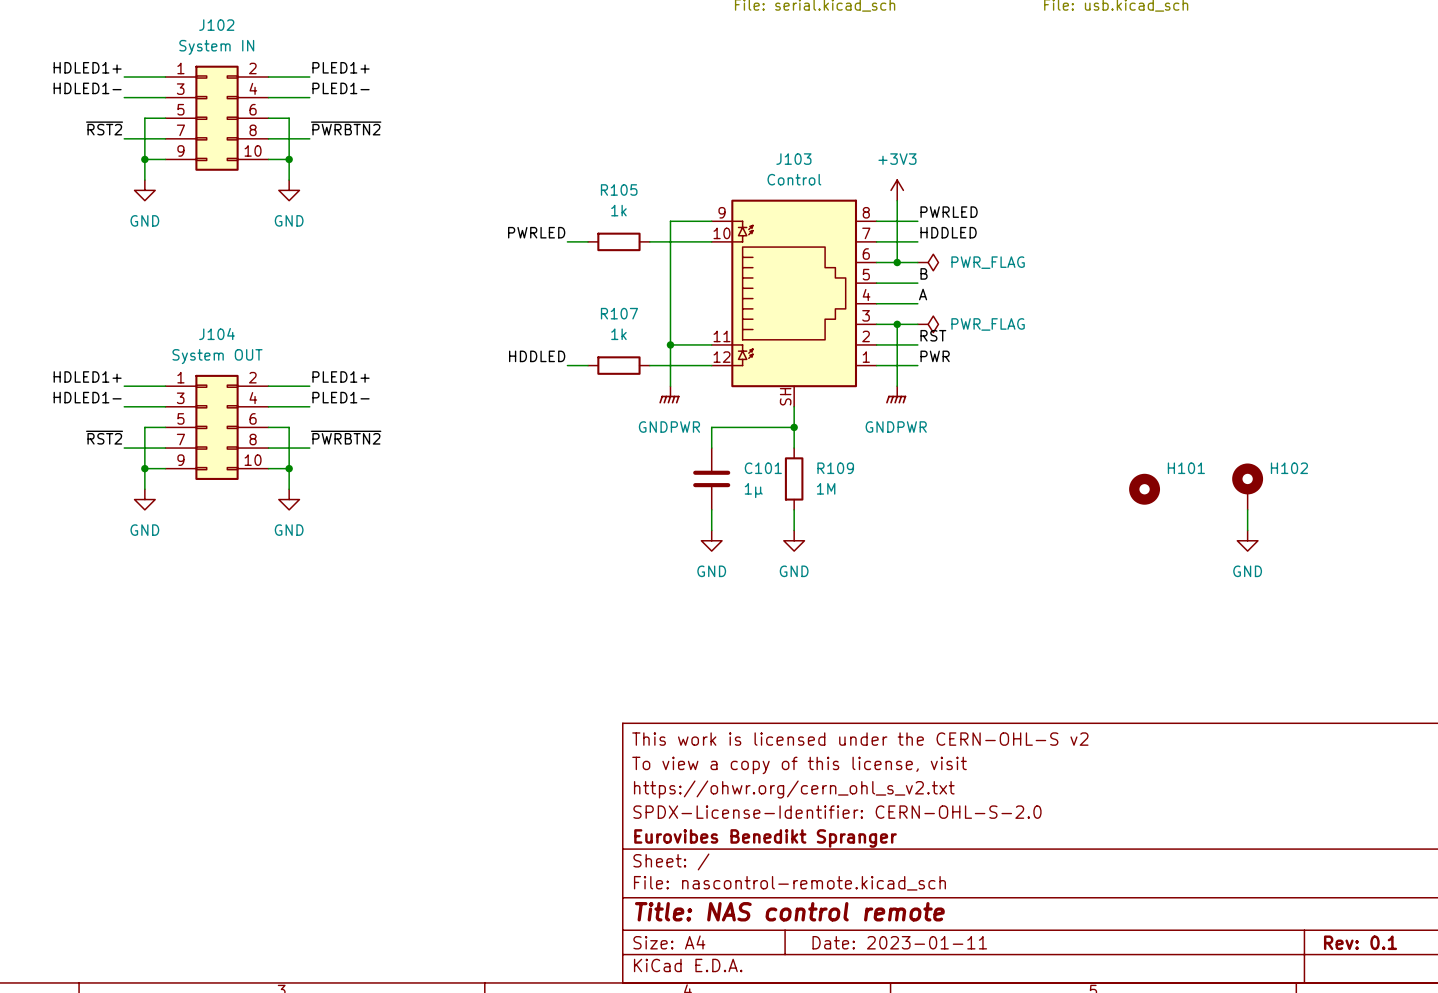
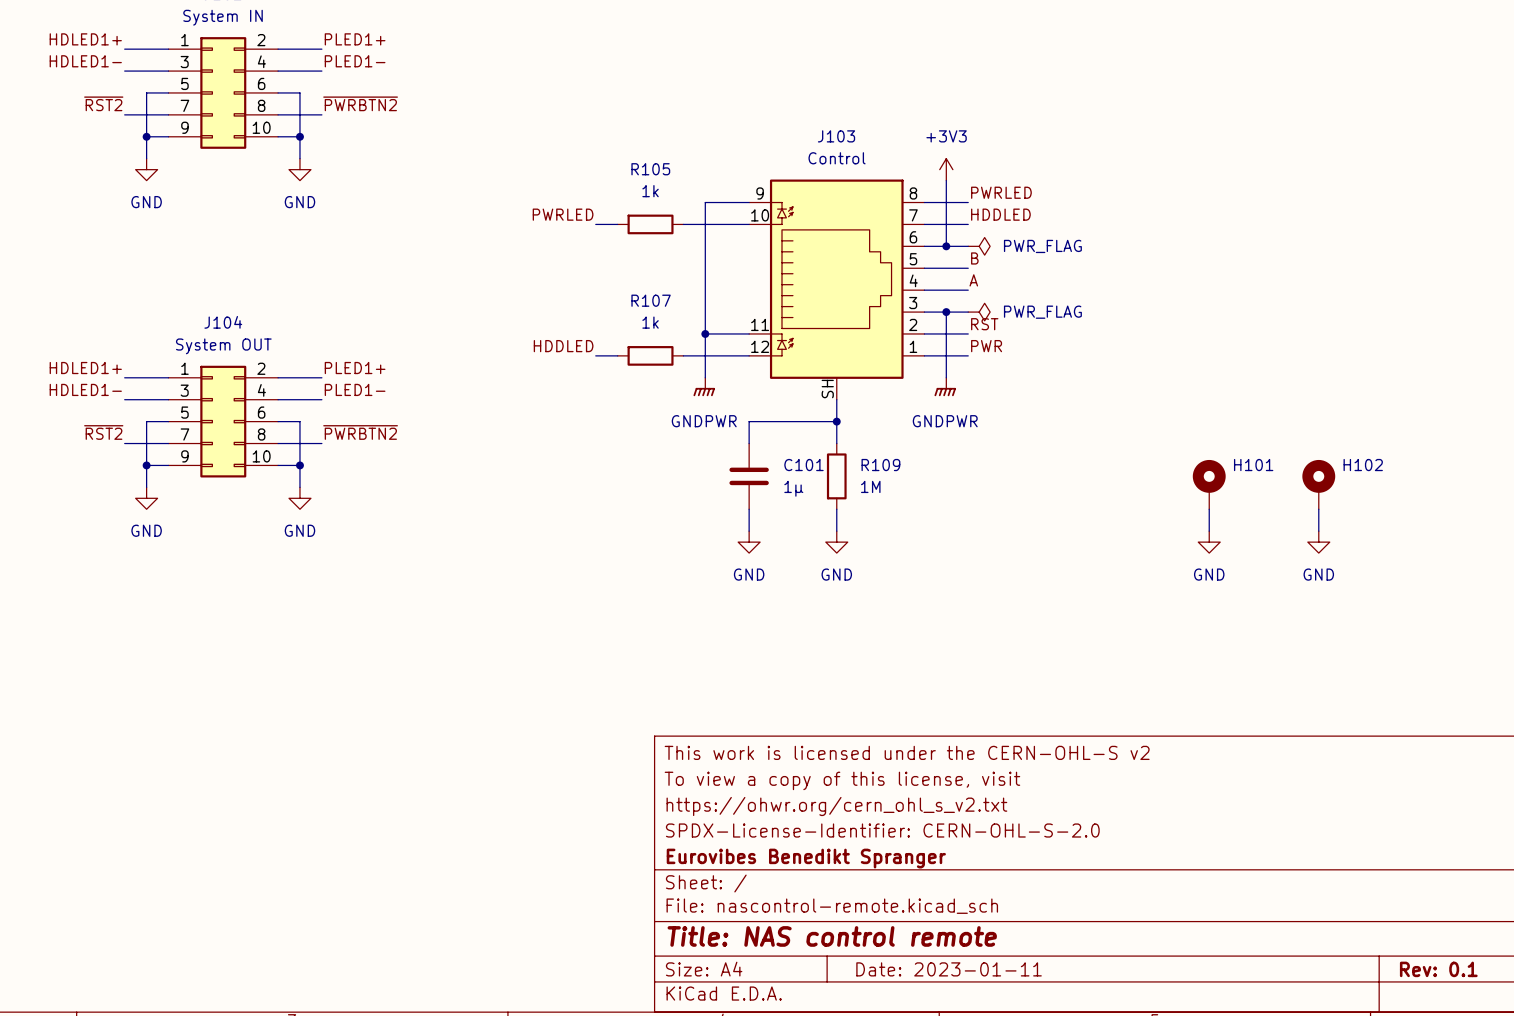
H101 symbol: [1129, 473, 1161, 505] -> [1192, 459, 1226, 510]
wire: none -> (1209, 509) (1209, 531)
power symbol: none -> GND (1209, 542)

